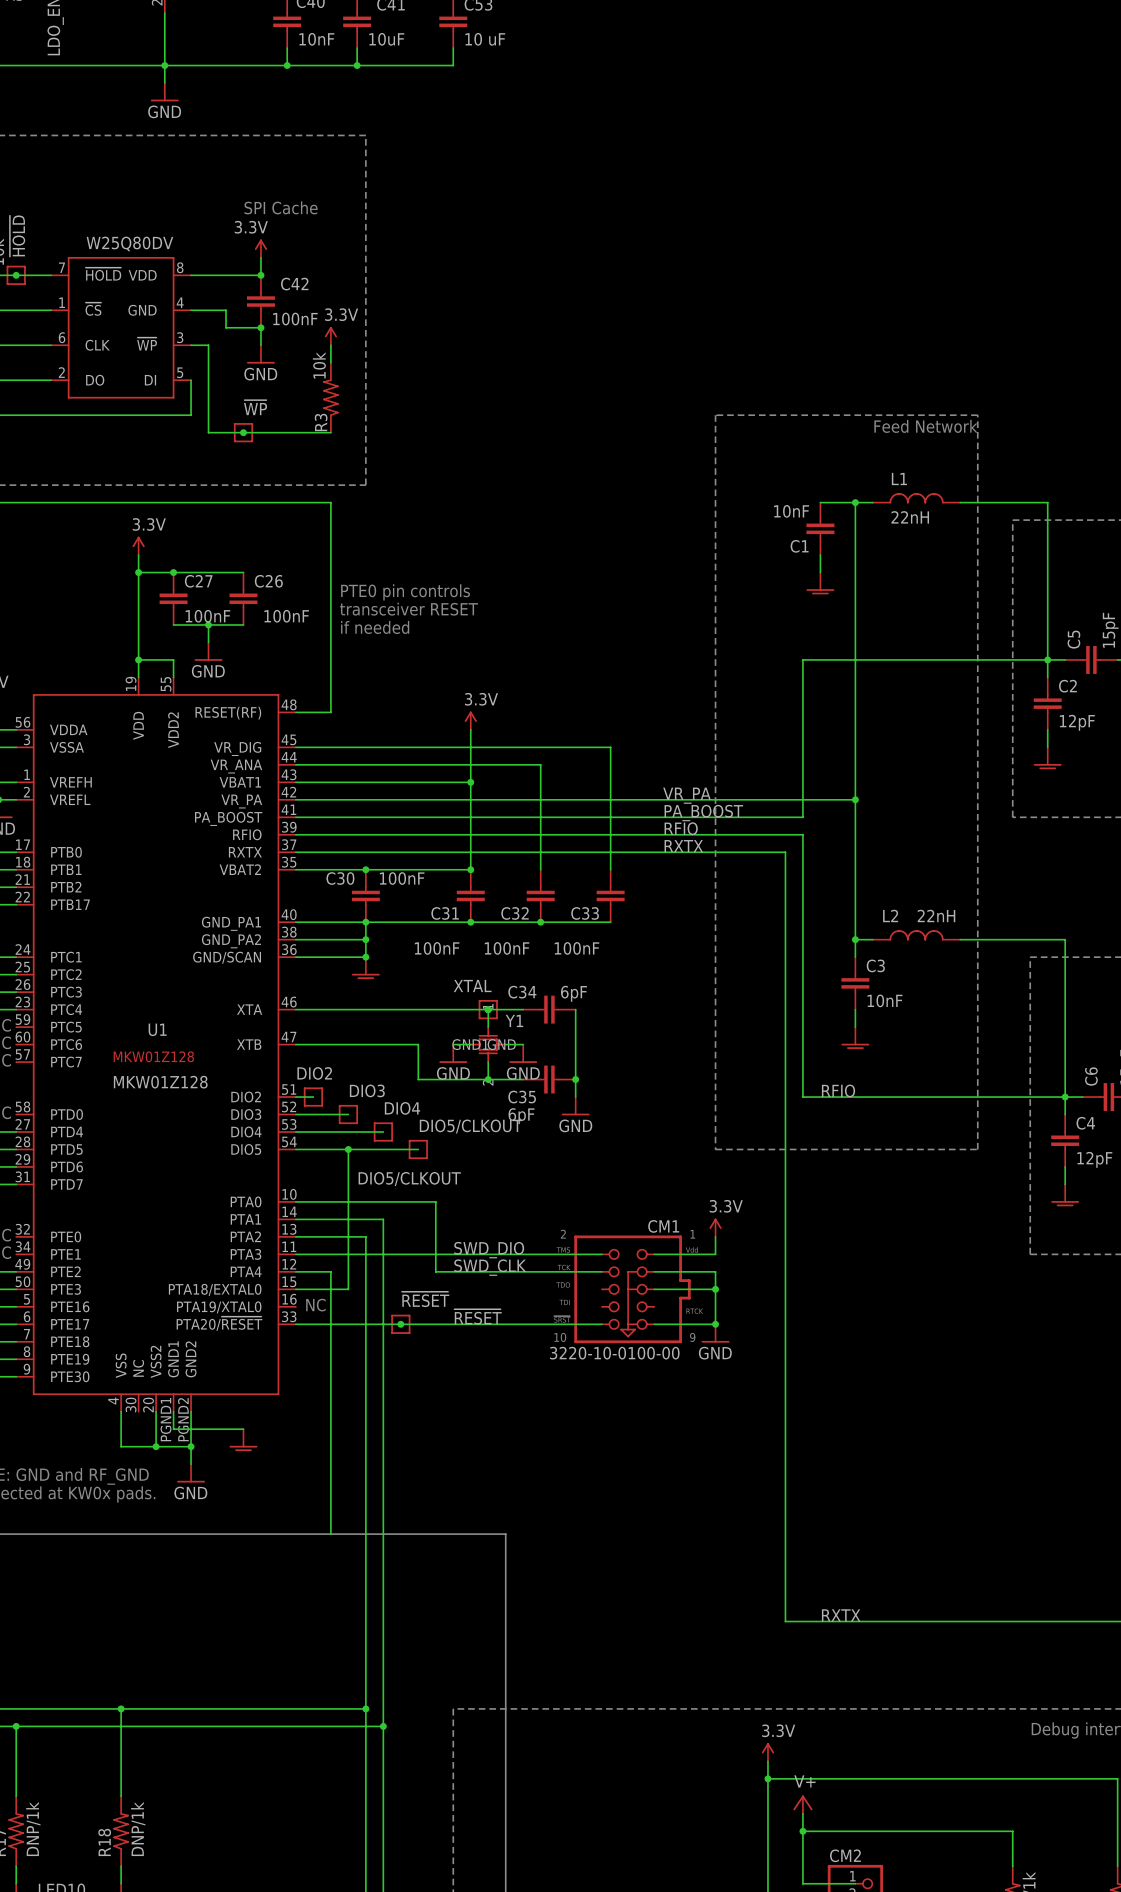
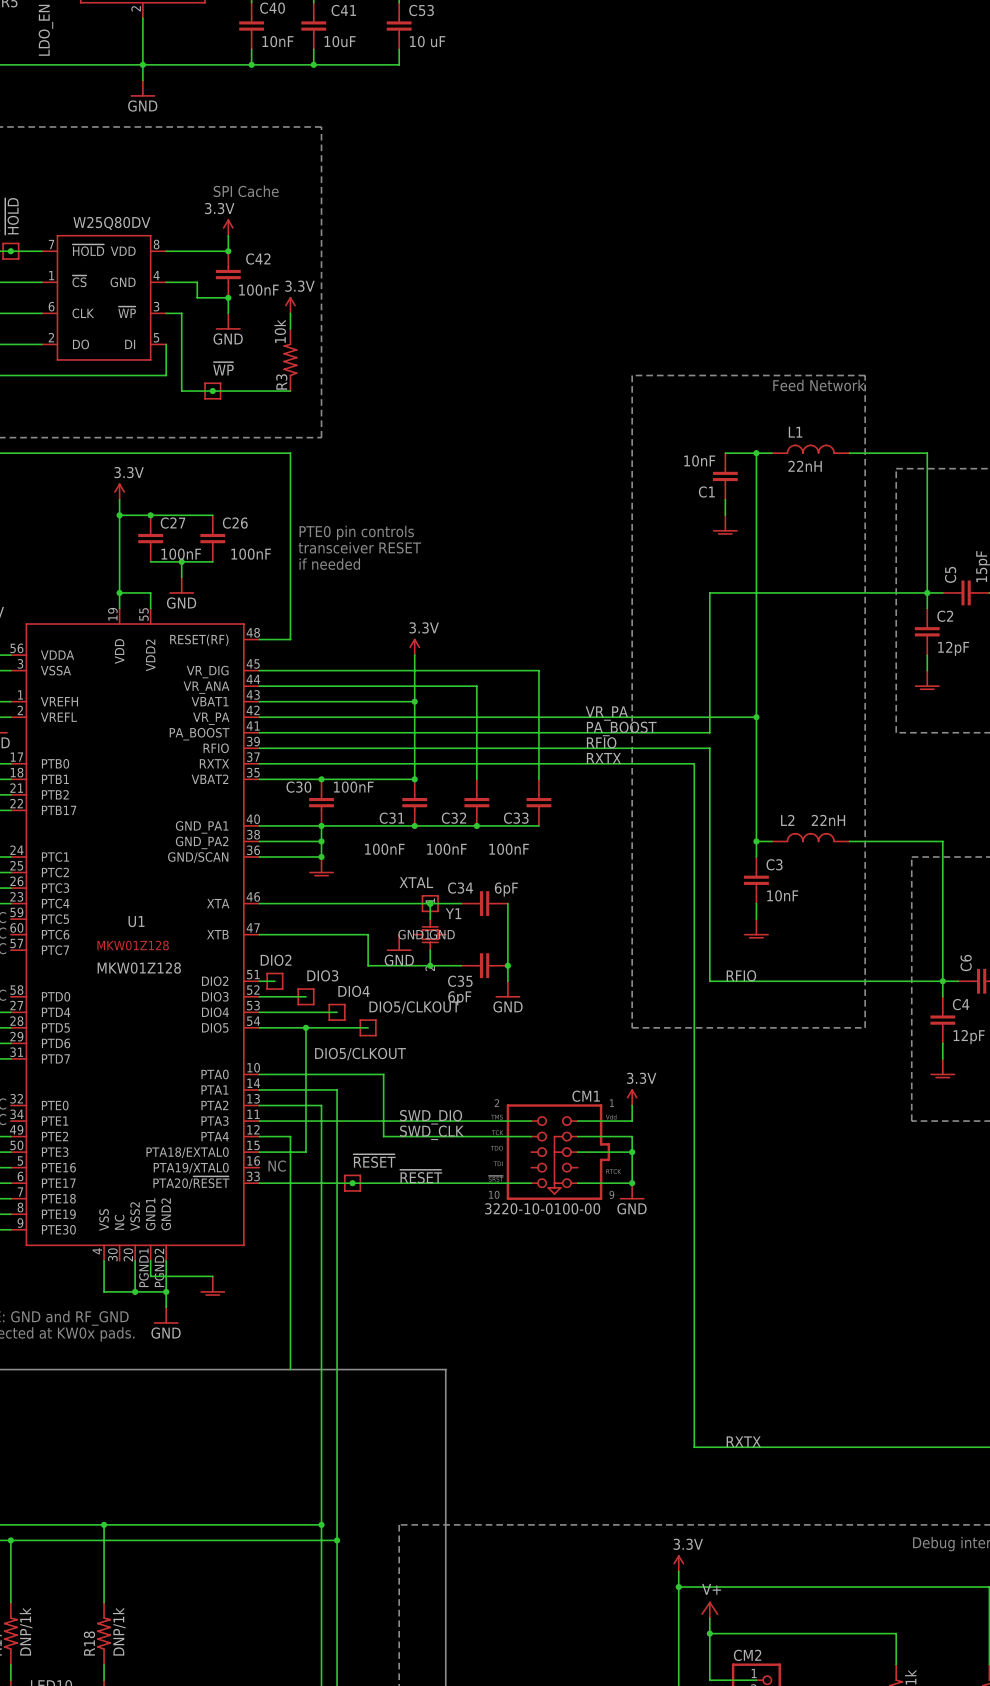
wire: (453, 1044) (470, 1044) -> none
wire: (505, 1044) (523, 1044) -> none
power symbol: GND (523, 1053) -> none

